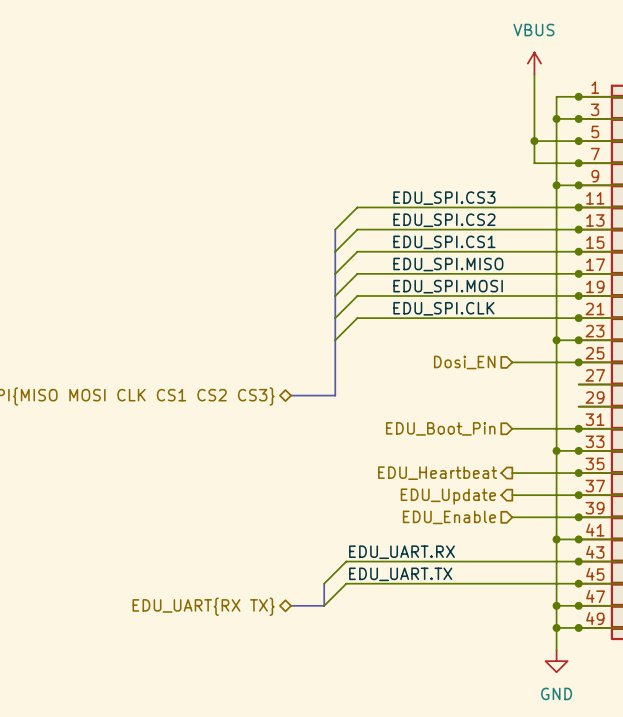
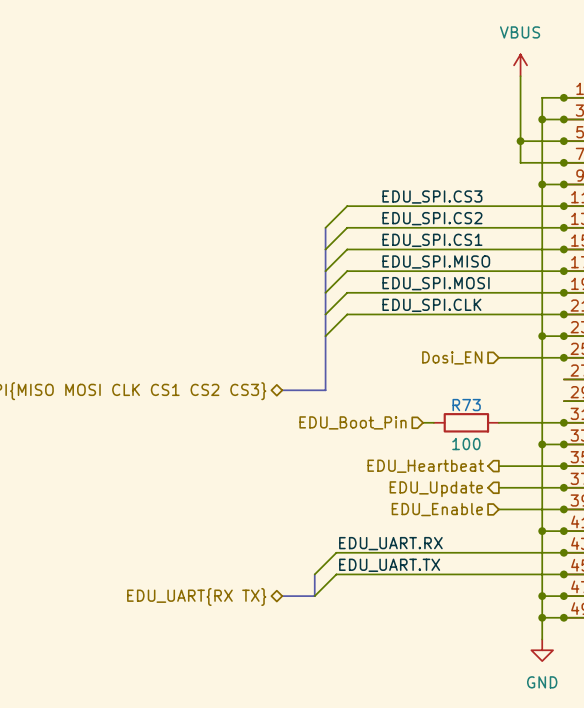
wire: none -> (423, 422) (433, 422)
hierarchical label position: EDU_Boot_Pin (440, 428) -> EDU_Boot_Pin (353, 422)
R73: none -> 100 (466, 422)

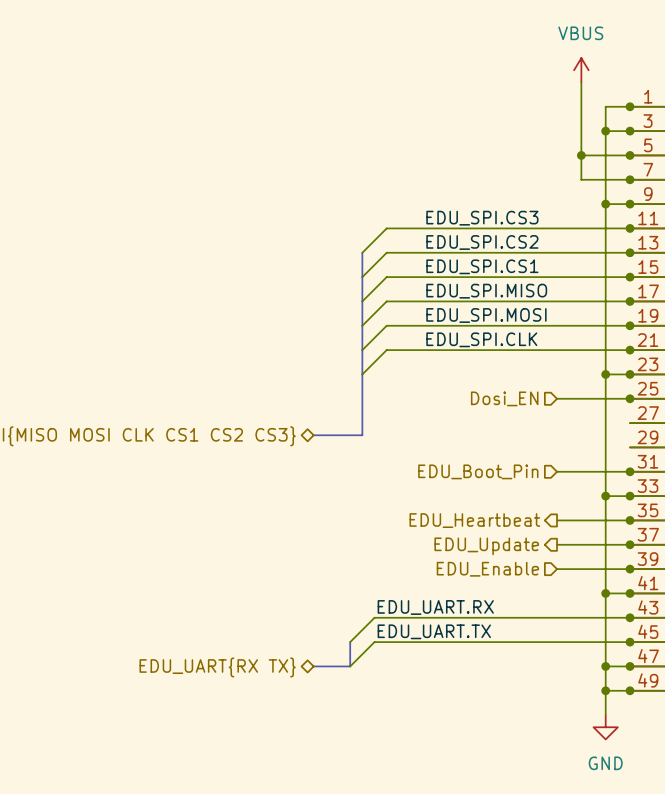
hierarchical label position: EDU_Boot_Pin (353, 422) -> EDU_Boot_Pin (478, 471)
wire: (423, 422) (433, 422) -> none
R73: 100 (466, 422) -> none

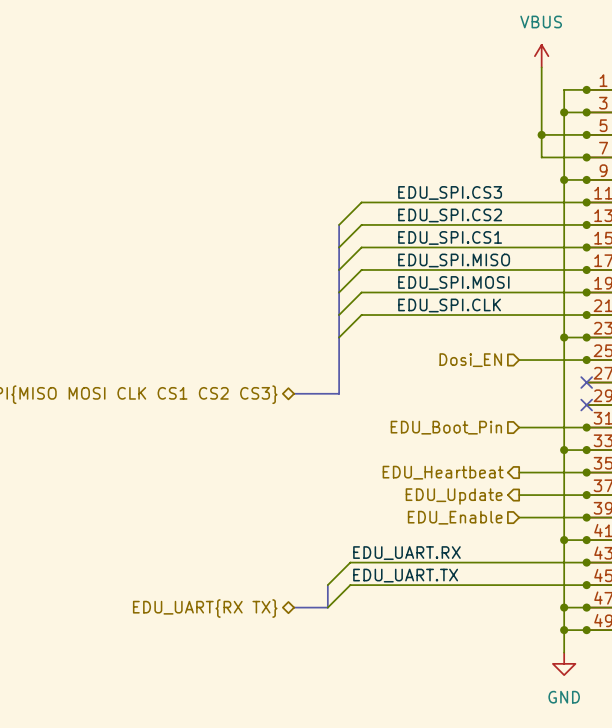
no-connect mark: none -> (586, 382)
no-connect mark: none -> (586, 405)

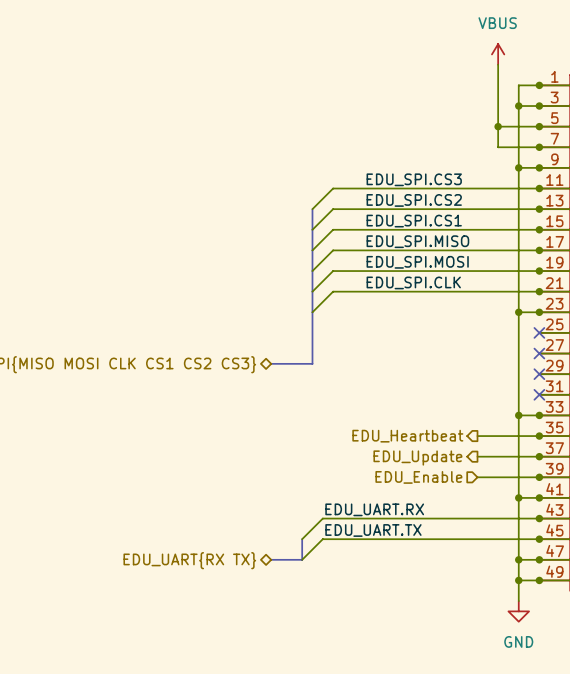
hierarchical label: Dosi_EN (470, 360) -> none
wire: (519, 360) (586, 360) -> none
junction: (586, 360) -> none
no-connect mark: none -> (539, 332)
hierarchical label: EDU_Boot_Pin (446, 427) -> none
wire: (519, 427) (586, 427) -> none
junction: (586, 427) -> none
no-connect mark: none -> (539, 394)

